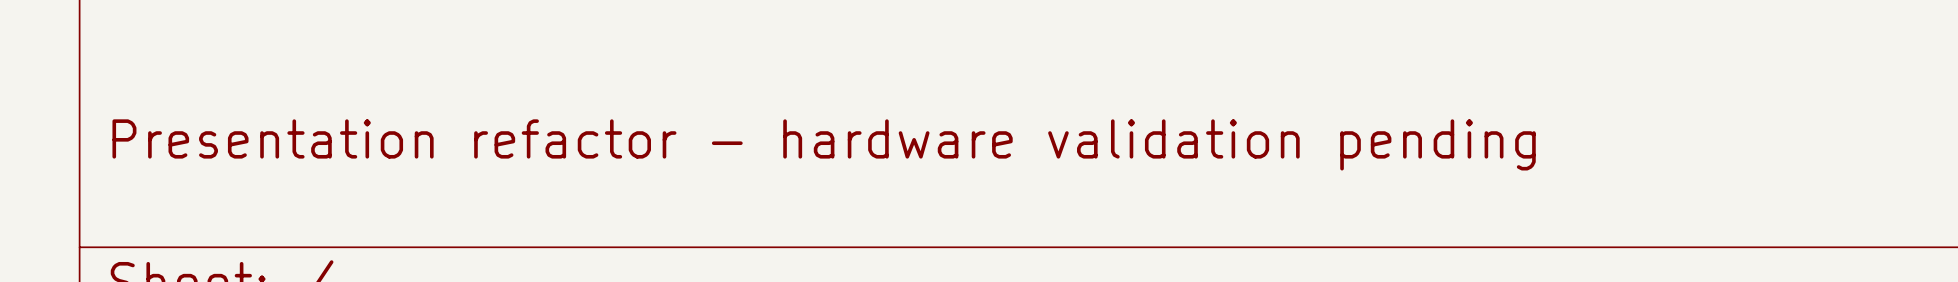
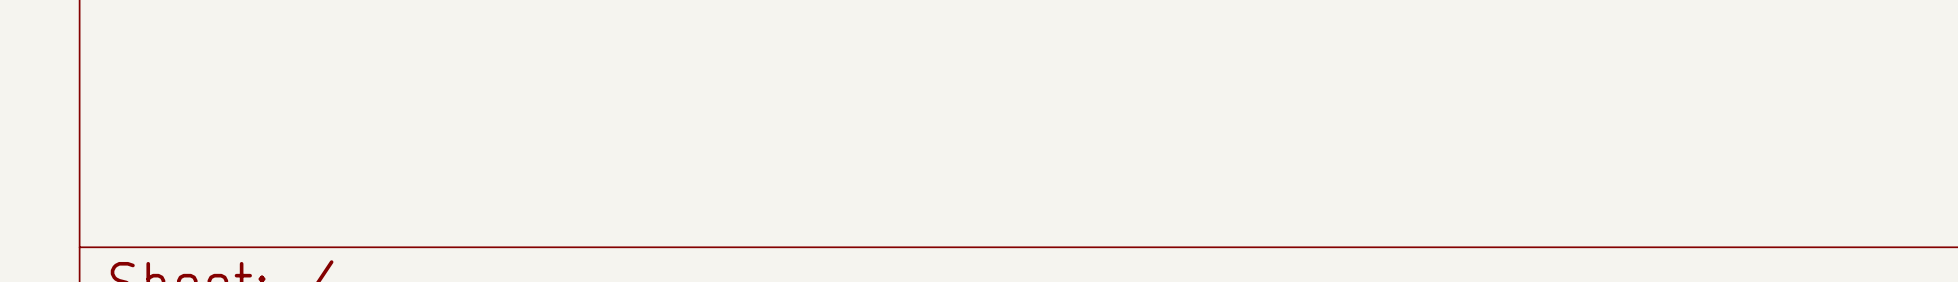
title block: Presentation refactor - hardware validation pending (824, 144) -> none

